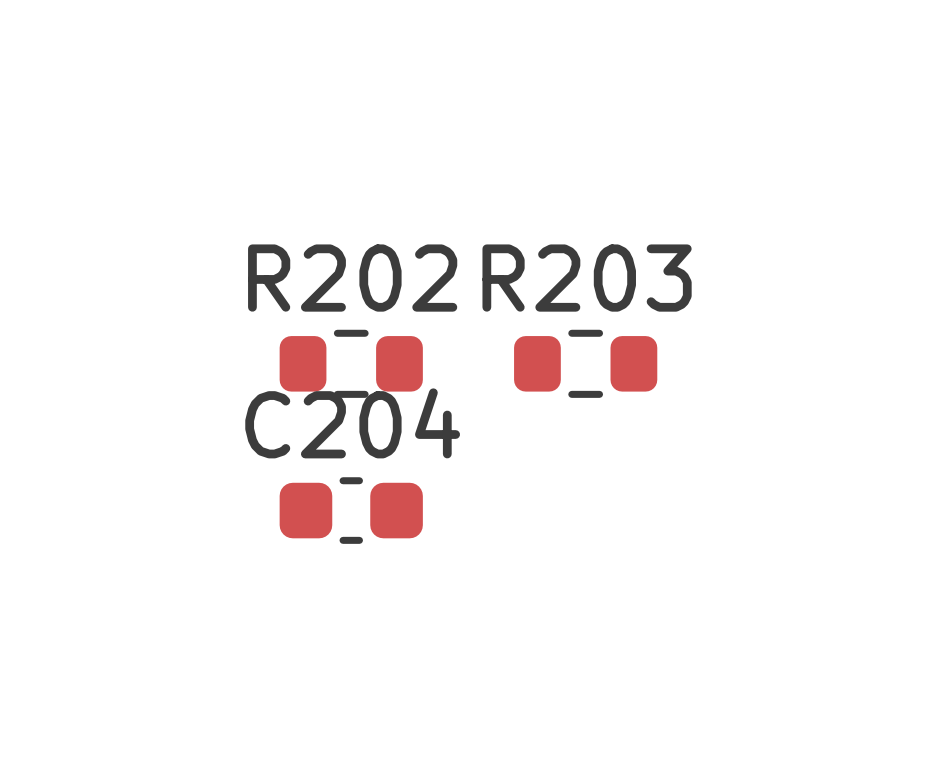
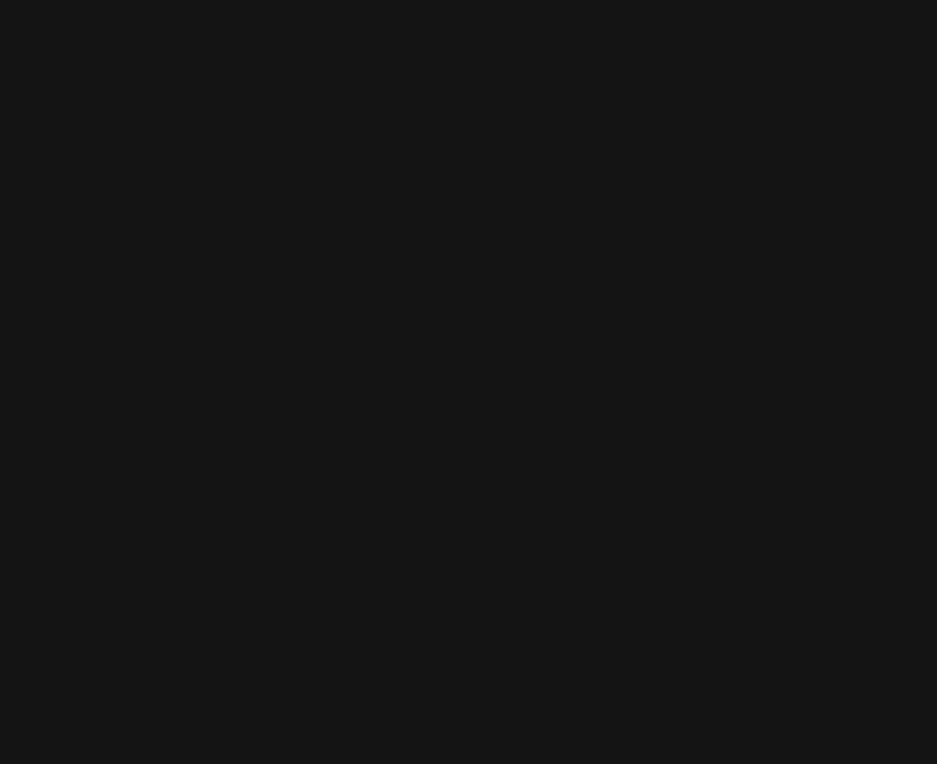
R202: (351, 363) -> none
R203: (585, 363) -> none
C204: (351, 510) -> none

